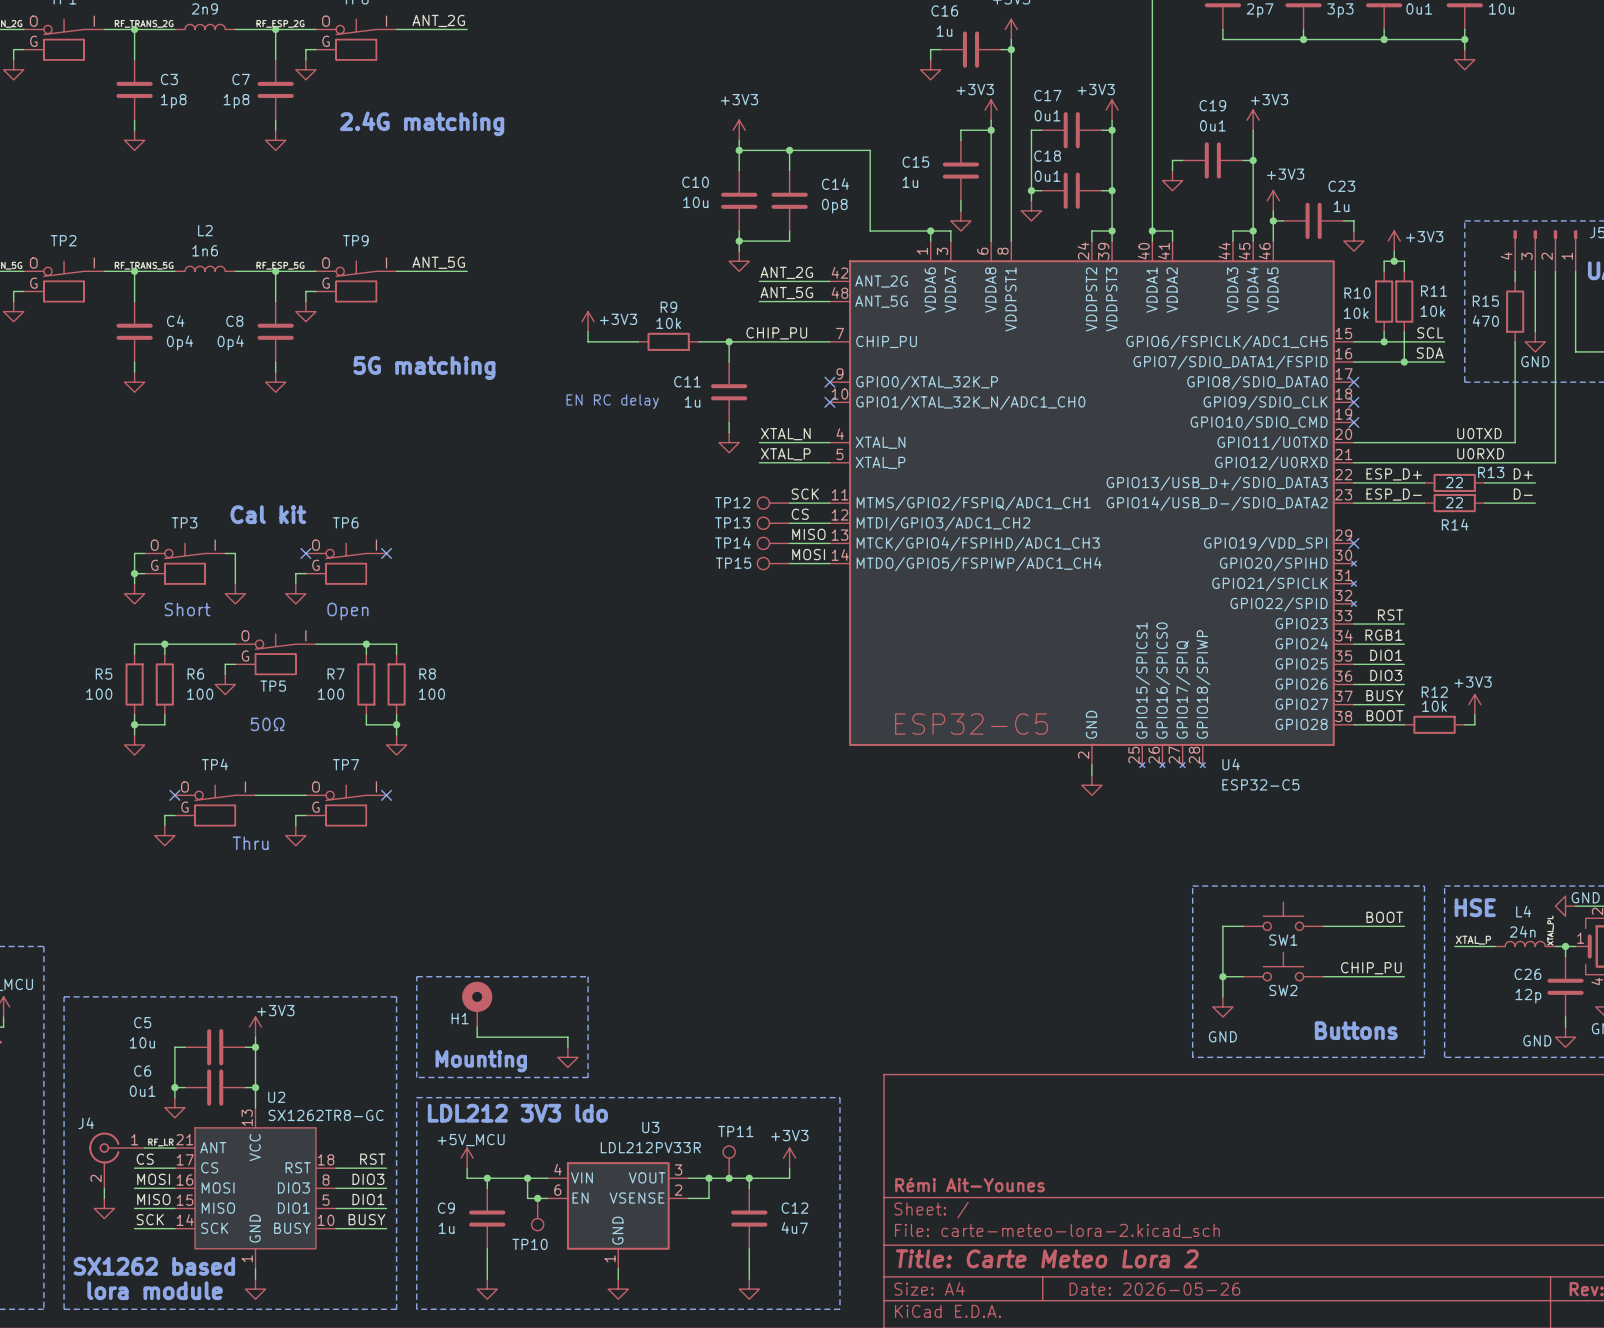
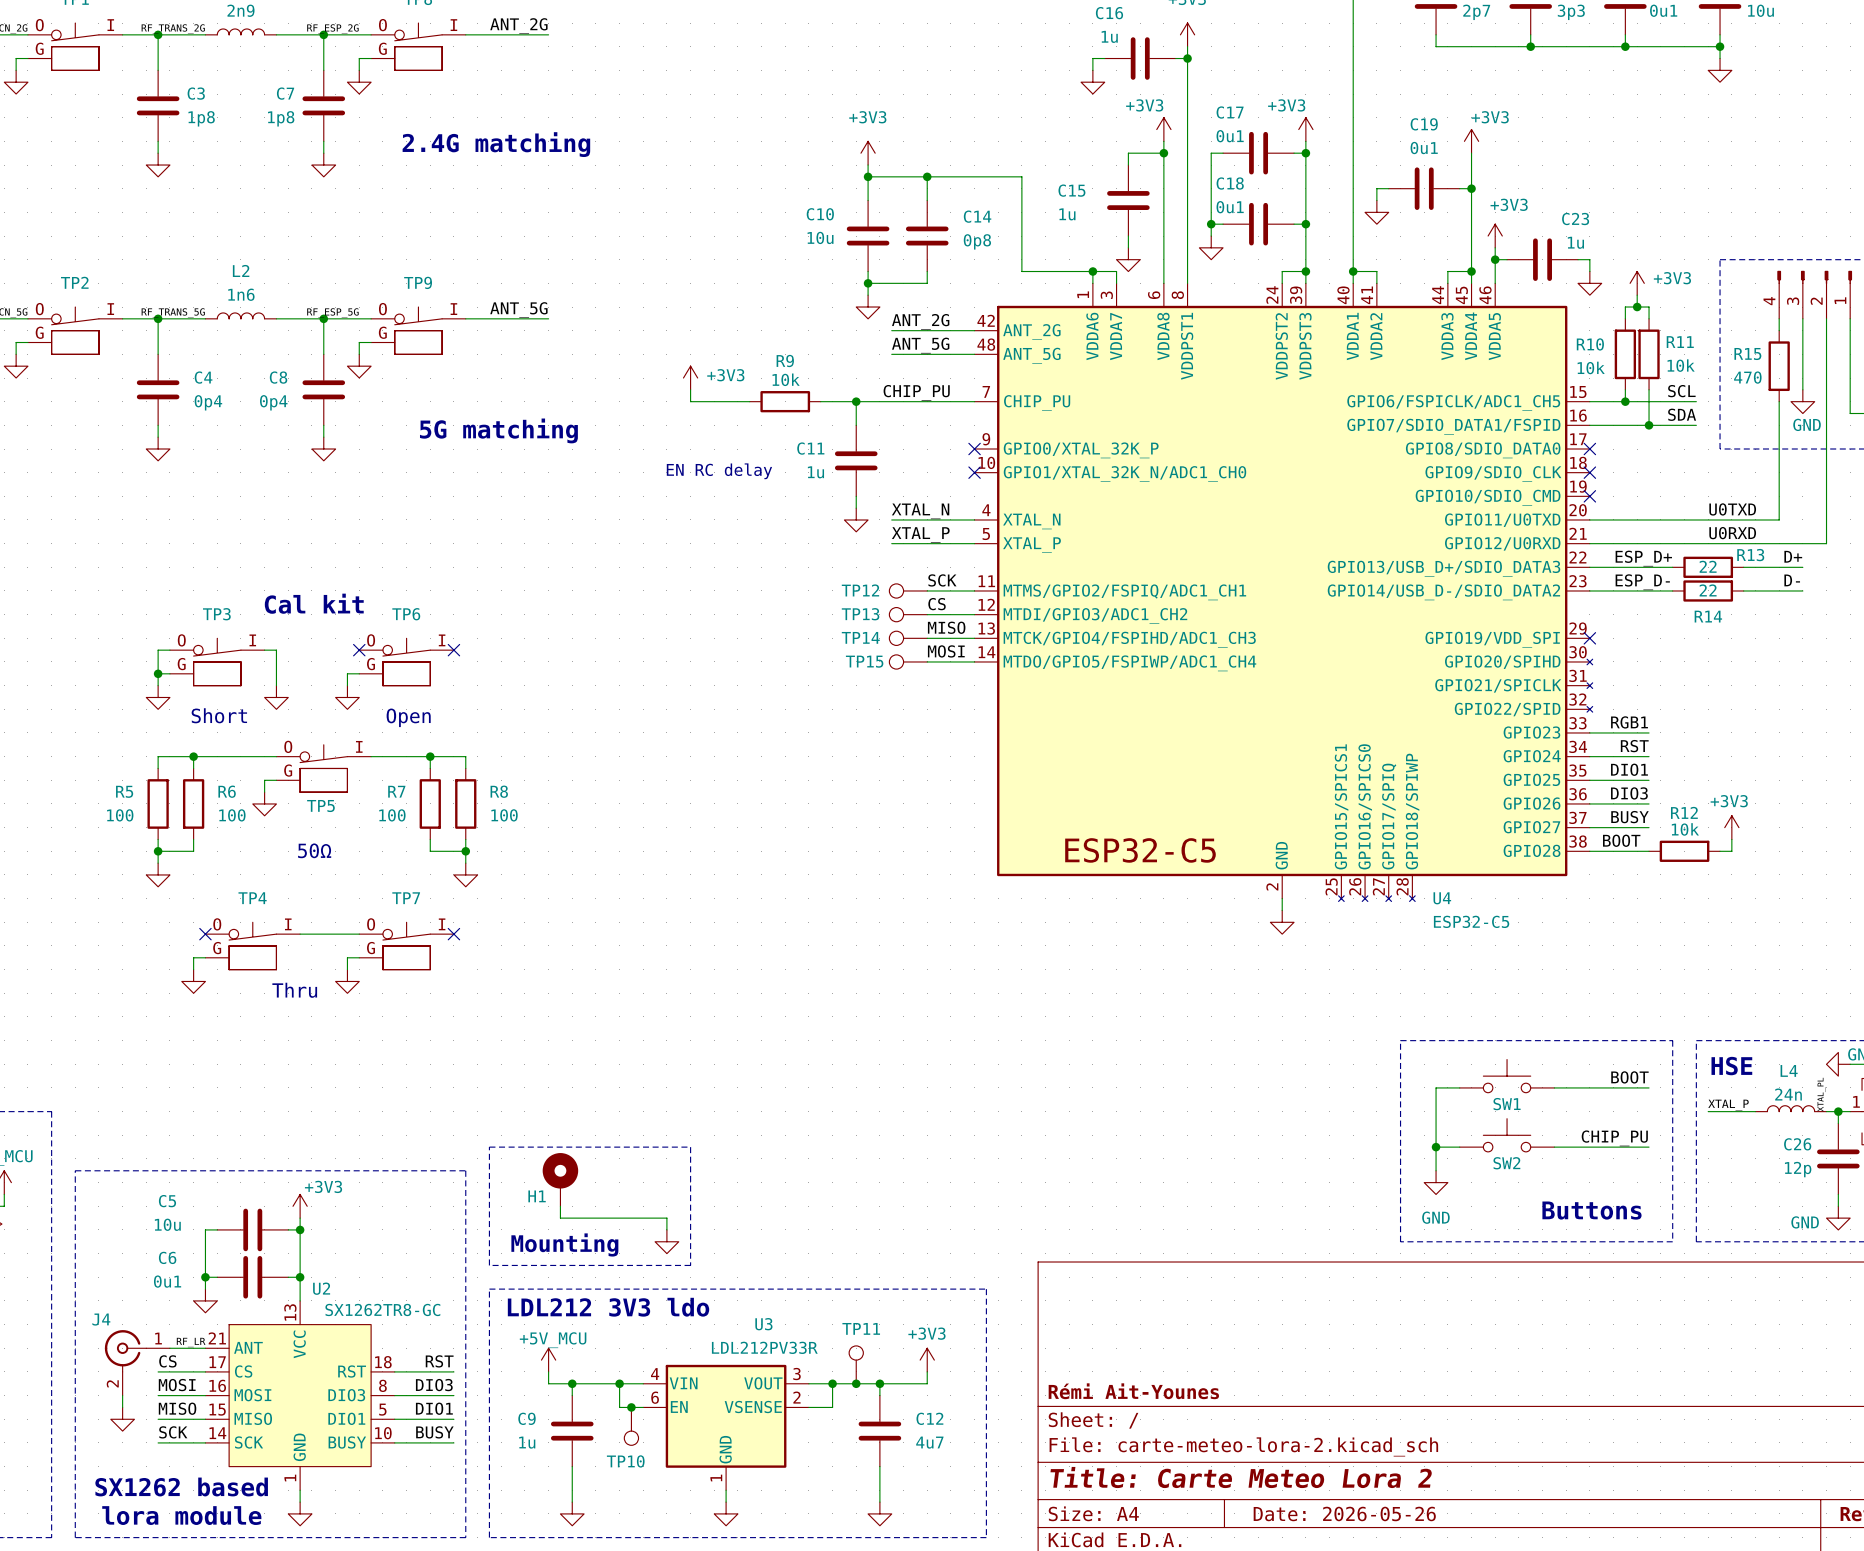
label: RST (1390, 615) -> RGB1 (1629, 722)
label: RGB1 (1383, 635) -> RST (1634, 746)

